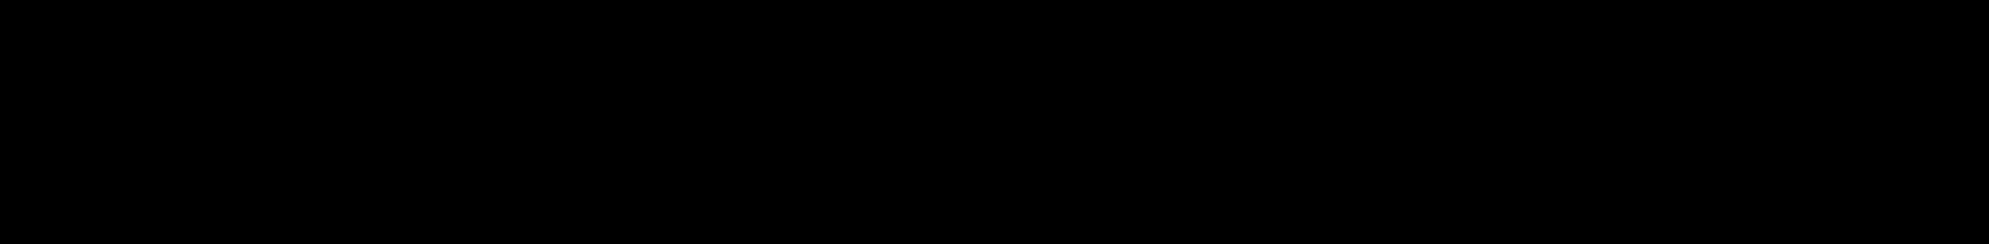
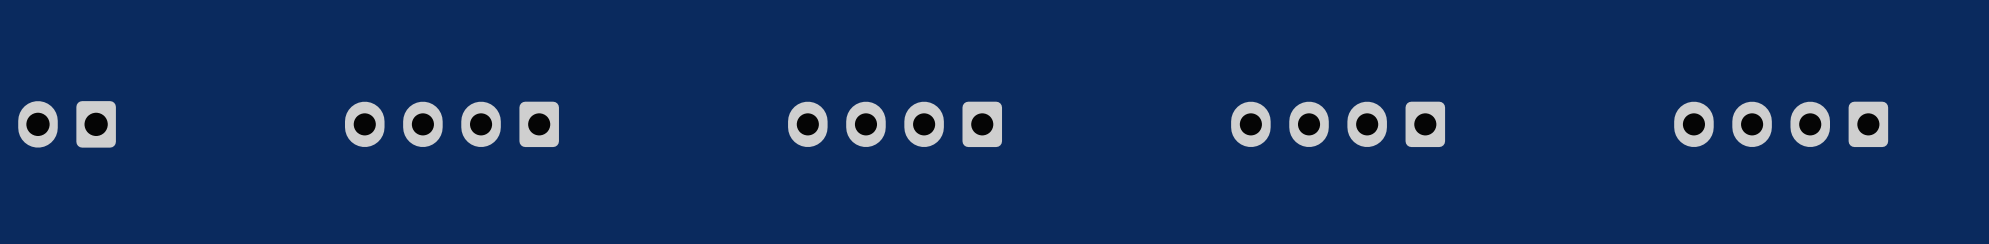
part: none -> (67, 124)
part: none -> (451, 124)
part: none -> (895, 124)
part: none -> (1338, 124)
part: none -> (1781, 124)

